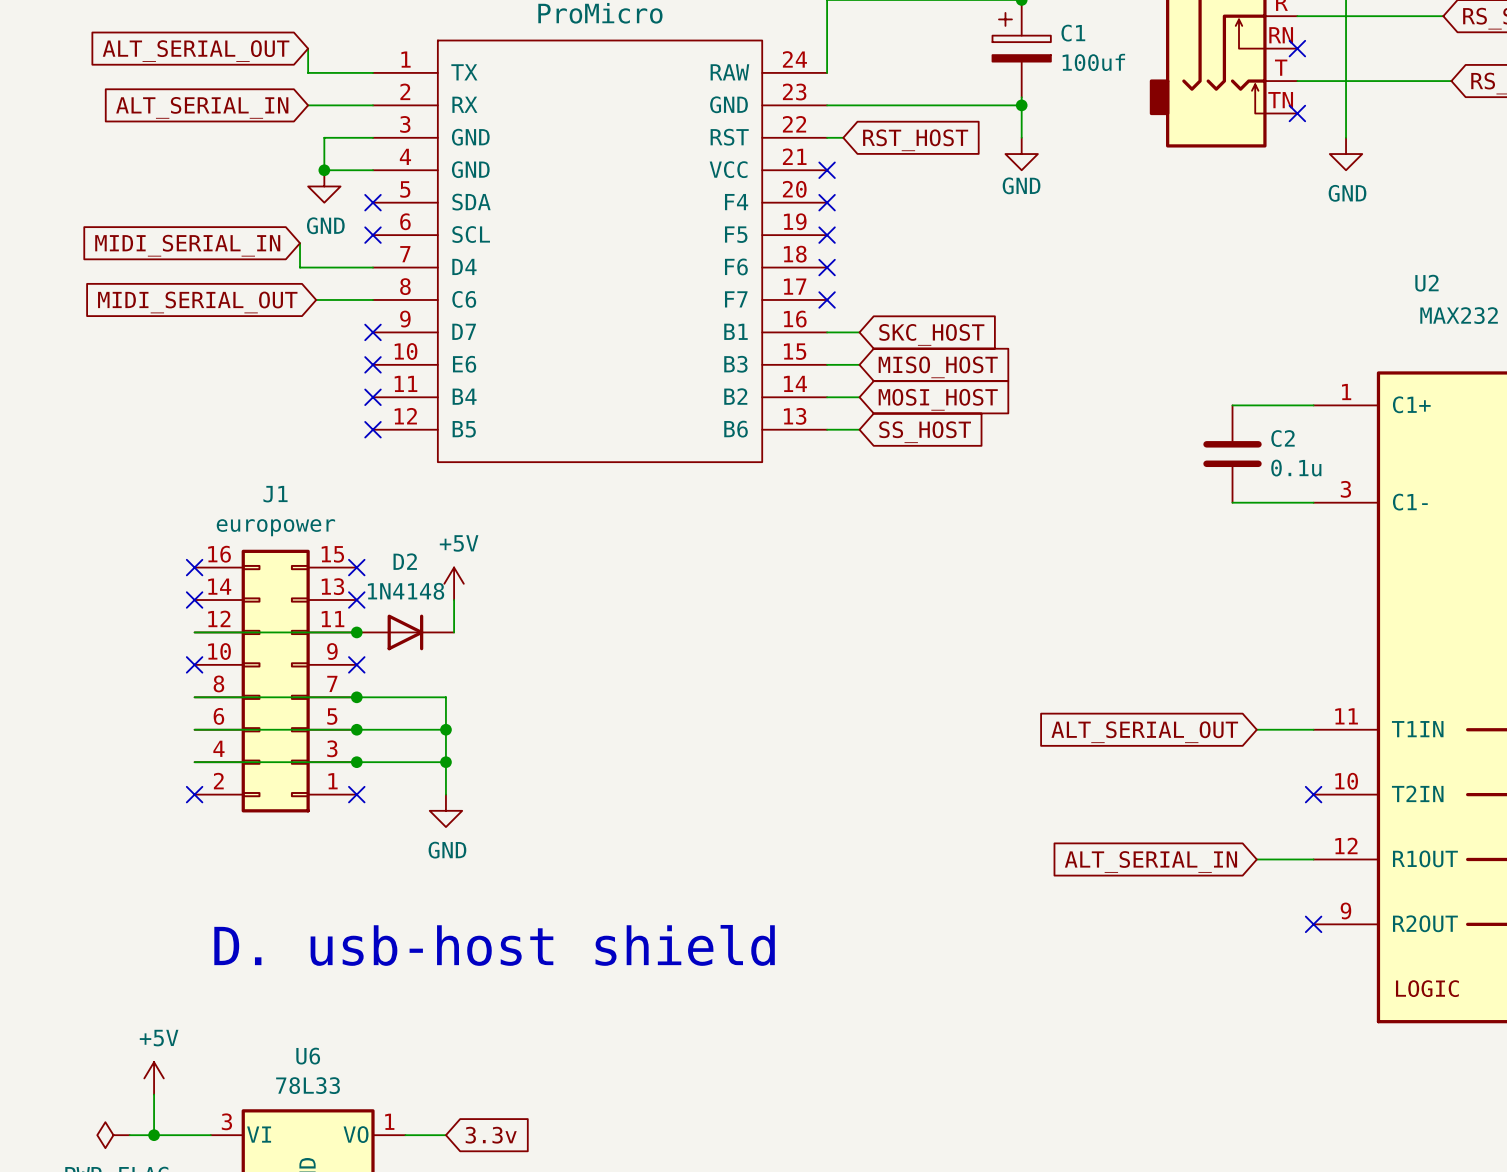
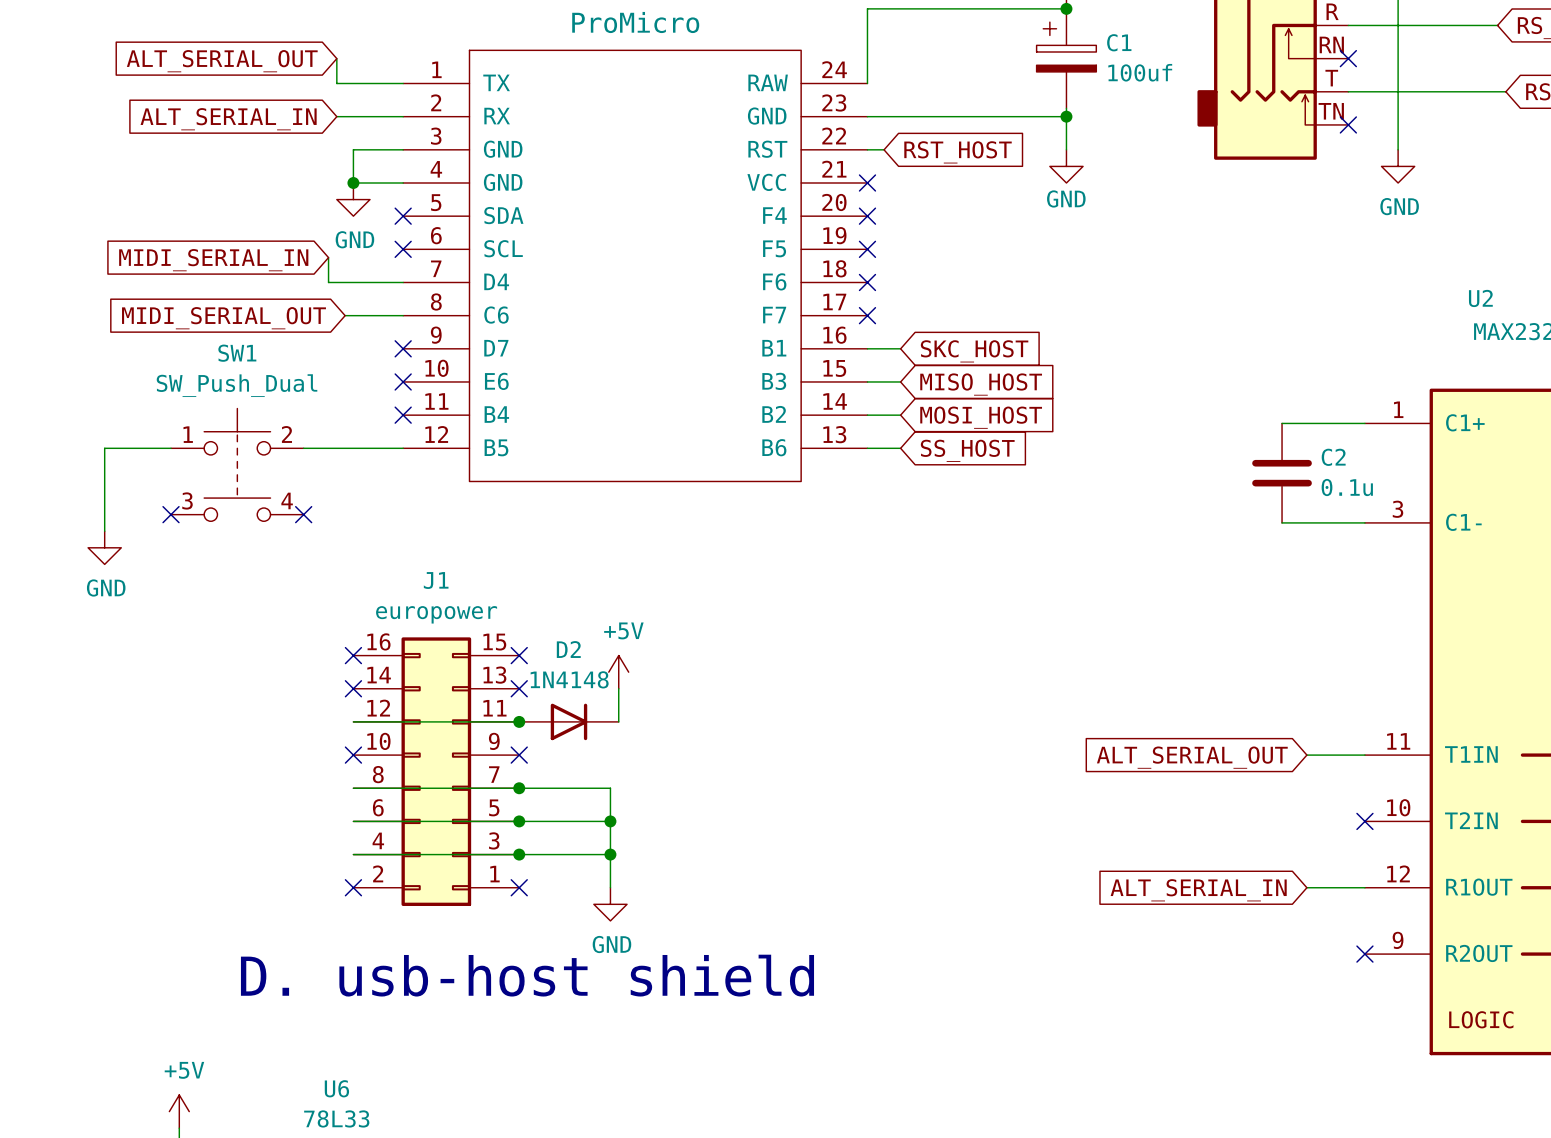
wire: none -> (171, 448) (104, 448) (104, 531)
wire: none -> (303, 448) (403, 448)
no-connect mark: (372, 429) -> none
SW1: none -> SW_Push_Dual (237, 464)
no-connect mark: none -> (171, 514)
no-connect mark: none -> (303, 514)
power symbol: none -> GND (104, 547)
no-connect mark: (194, 567) -> none
no-connect mark: (356, 567) -> none
power symbol position: +5V (454, 583) -> +5V (618, 672)
no-connect mark: (194, 600) -> none
no-connect mark: (356, 600) -> none
wire: (454, 600) (454, 632) -> (618, 688) (618, 721)
wire: (194, 632) (356, 632) -> none
no-connect mark: none -> (353, 655)
junction: (356, 632) -> none
D2 position: (405, 632) -> (568, 721)
no-connect mark: none -> (519, 655)
no-connect mark: (194, 664) -> none
no-connect mark: none -> (353, 688)
no-connect mark: (356, 664) -> none
no-connect mark: none -> (519, 688)
J1 position: (275, 681) -> (436, 771)
wire: (194, 697) (324, 697) -> none
junction: (356, 697) -> none
wire: (445, 697) (445, 794) -> (477, 721) (519, 721)
junction: none -> (519, 721)
wire: (194, 729) (445, 729) -> (353, 821) (610, 821)
no-connect mark: none -> (353, 755)
junction: (356, 729) -> none
junction: (445, 729) -> none
no-connect mark: none -> (519, 755)
wire: (194, 762) (324, 762) -> none
junction: (356, 762) -> none
wire: none -> (477, 788) (610, 788) (610, 887)
junction: (445, 762) -> none
junction: none -> (519, 788)
no-connect mark: (194, 794) -> none
no-connect mark: (356, 794) -> none
junction: none -> (519, 821)
junction: none -> (610, 821)
power symbol position: GND (445, 810) -> GND (610, 904)
wire: none -> (353, 854) (610, 854)
junction: none -> (519, 854)
junction: none -> (610, 854)
no-connect mark: none -> (353, 887)
no-connect mark: none -> (519, 887)

